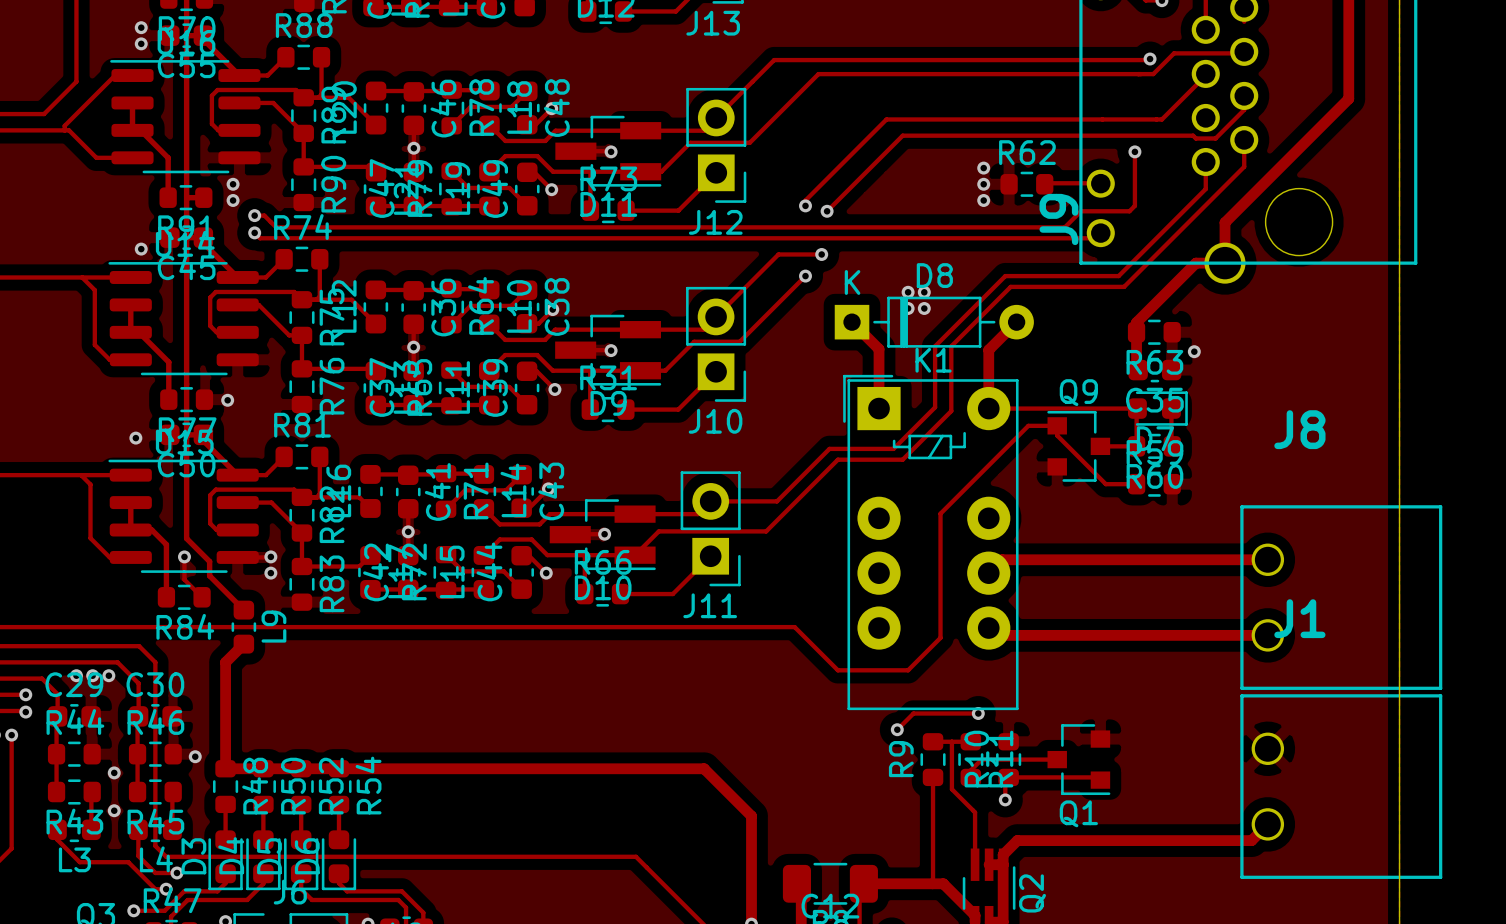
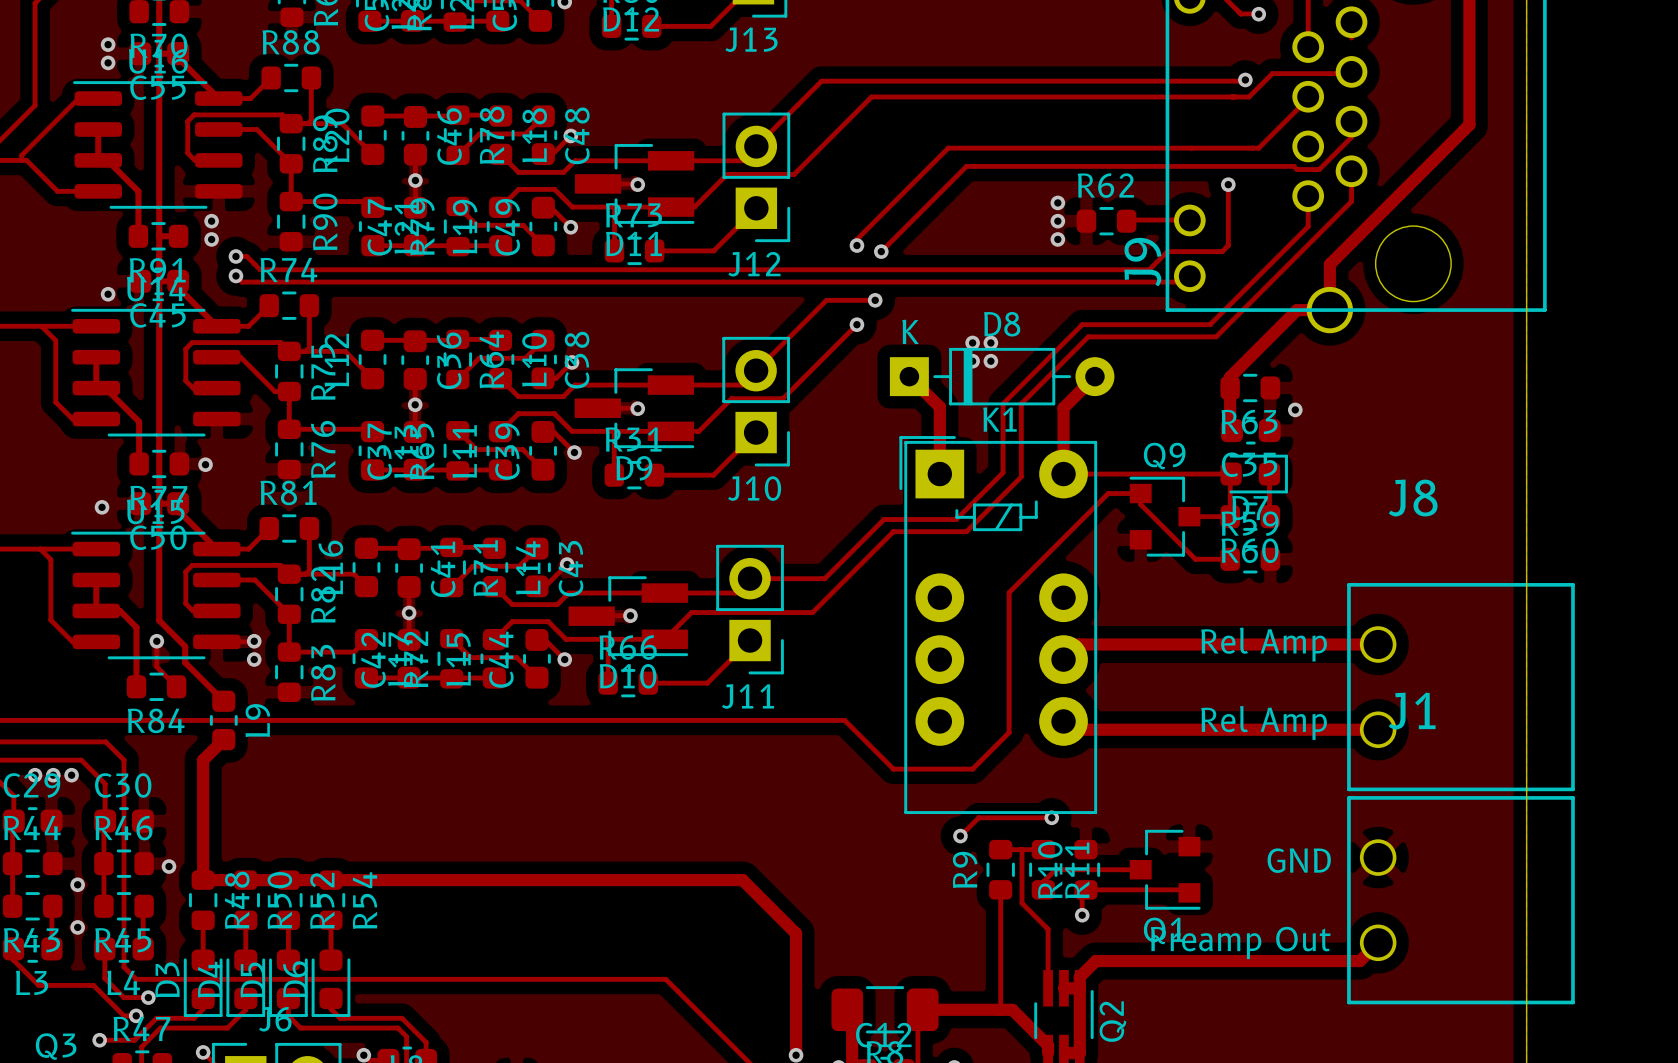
text: none -> Rel Amp (1264, 644)
text: none -> Rel Amp (1264, 722)
text: none -> GND (1299, 860)
text: none -> Preamp Out (1240, 942)

